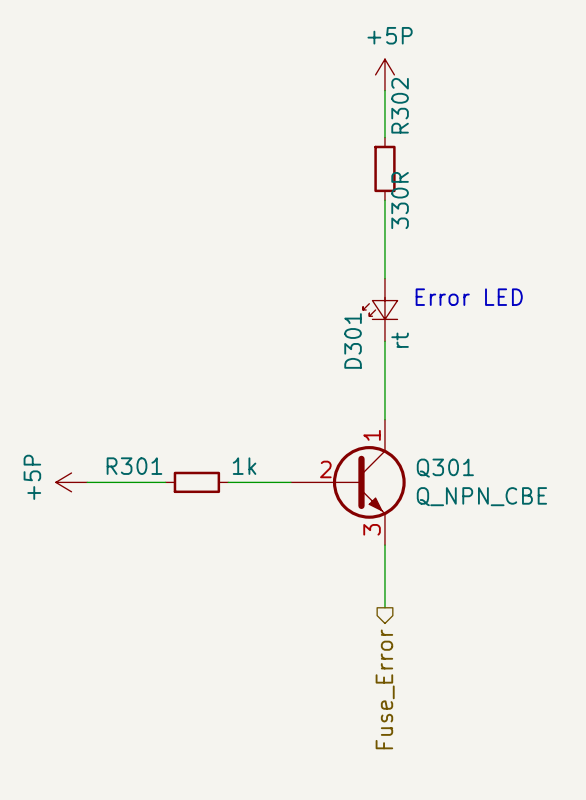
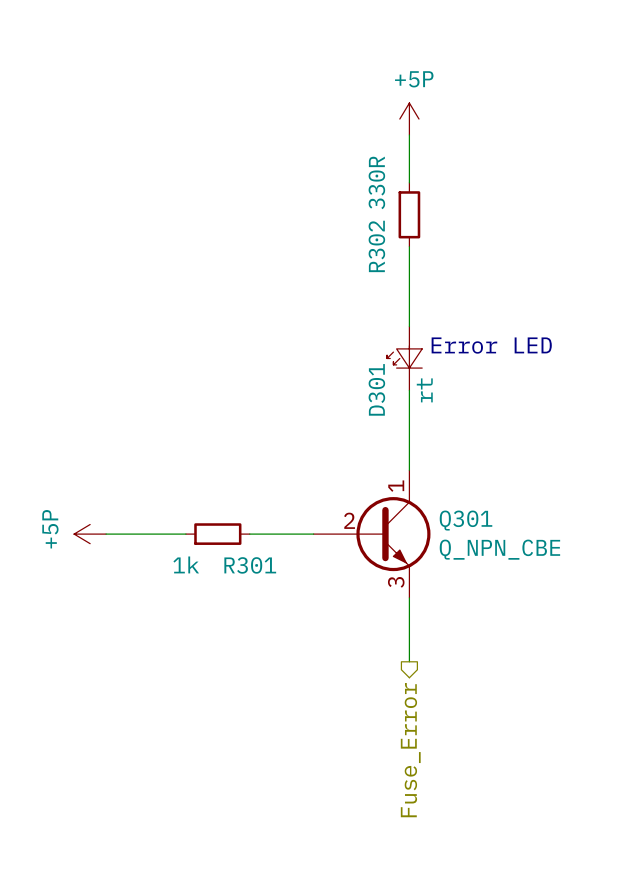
R302 name position: R302 (400, 105) -> R302 (376, 246)
R302 value position: 330R (400, 200) -> 330R (376, 182)
R301 name position: R301 (134, 466) -> R301 (250, 565)
R301 value position: 1k (244, 466) -> 1k (186, 564)

